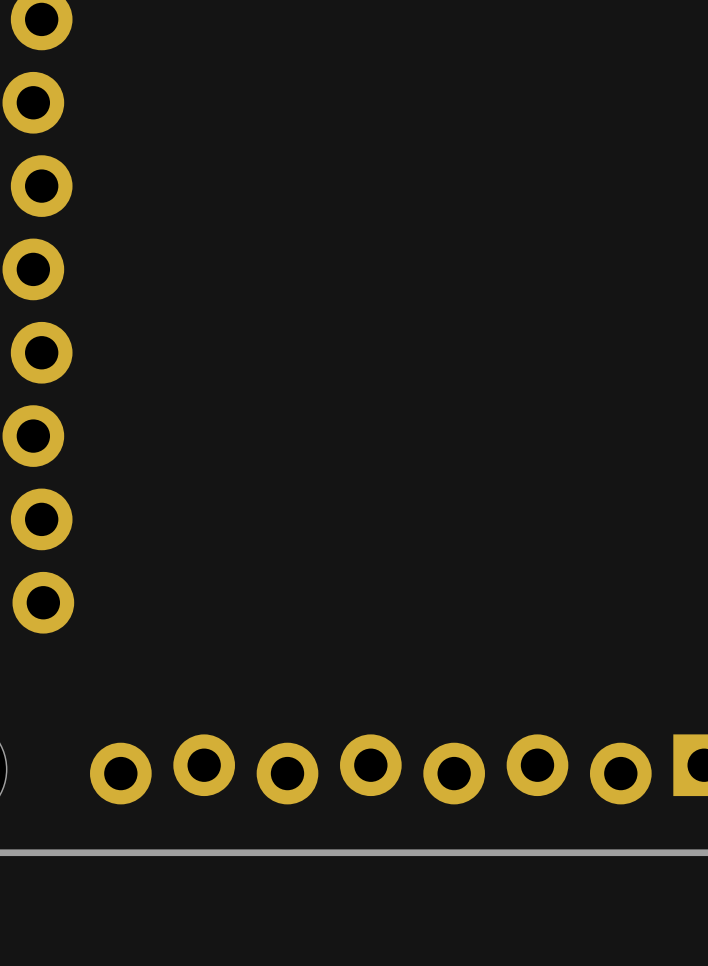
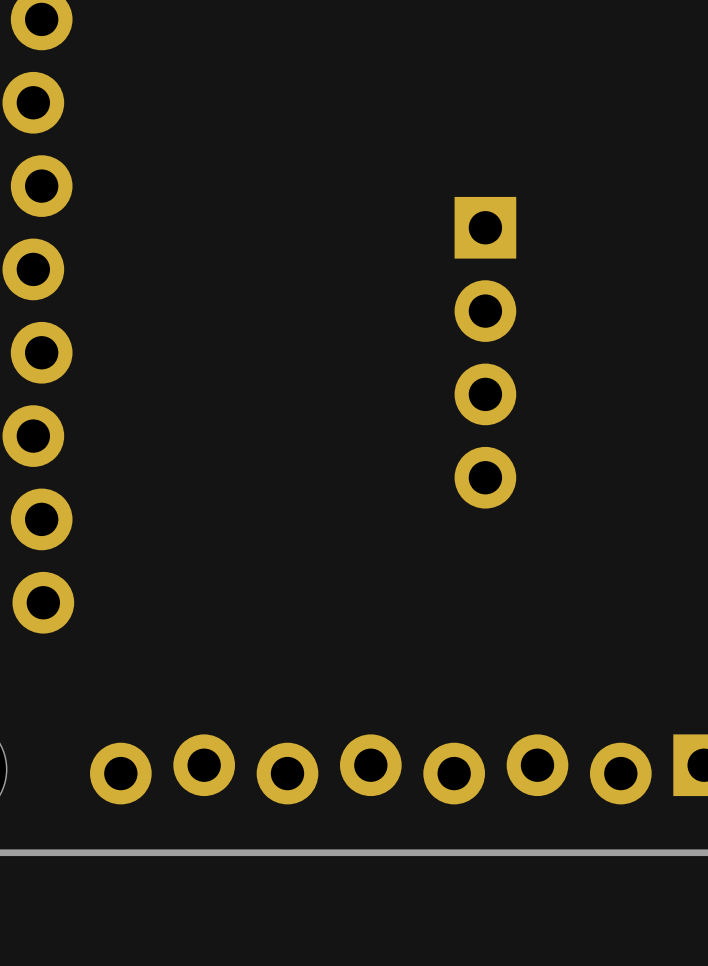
part: none -> (485, 352)

